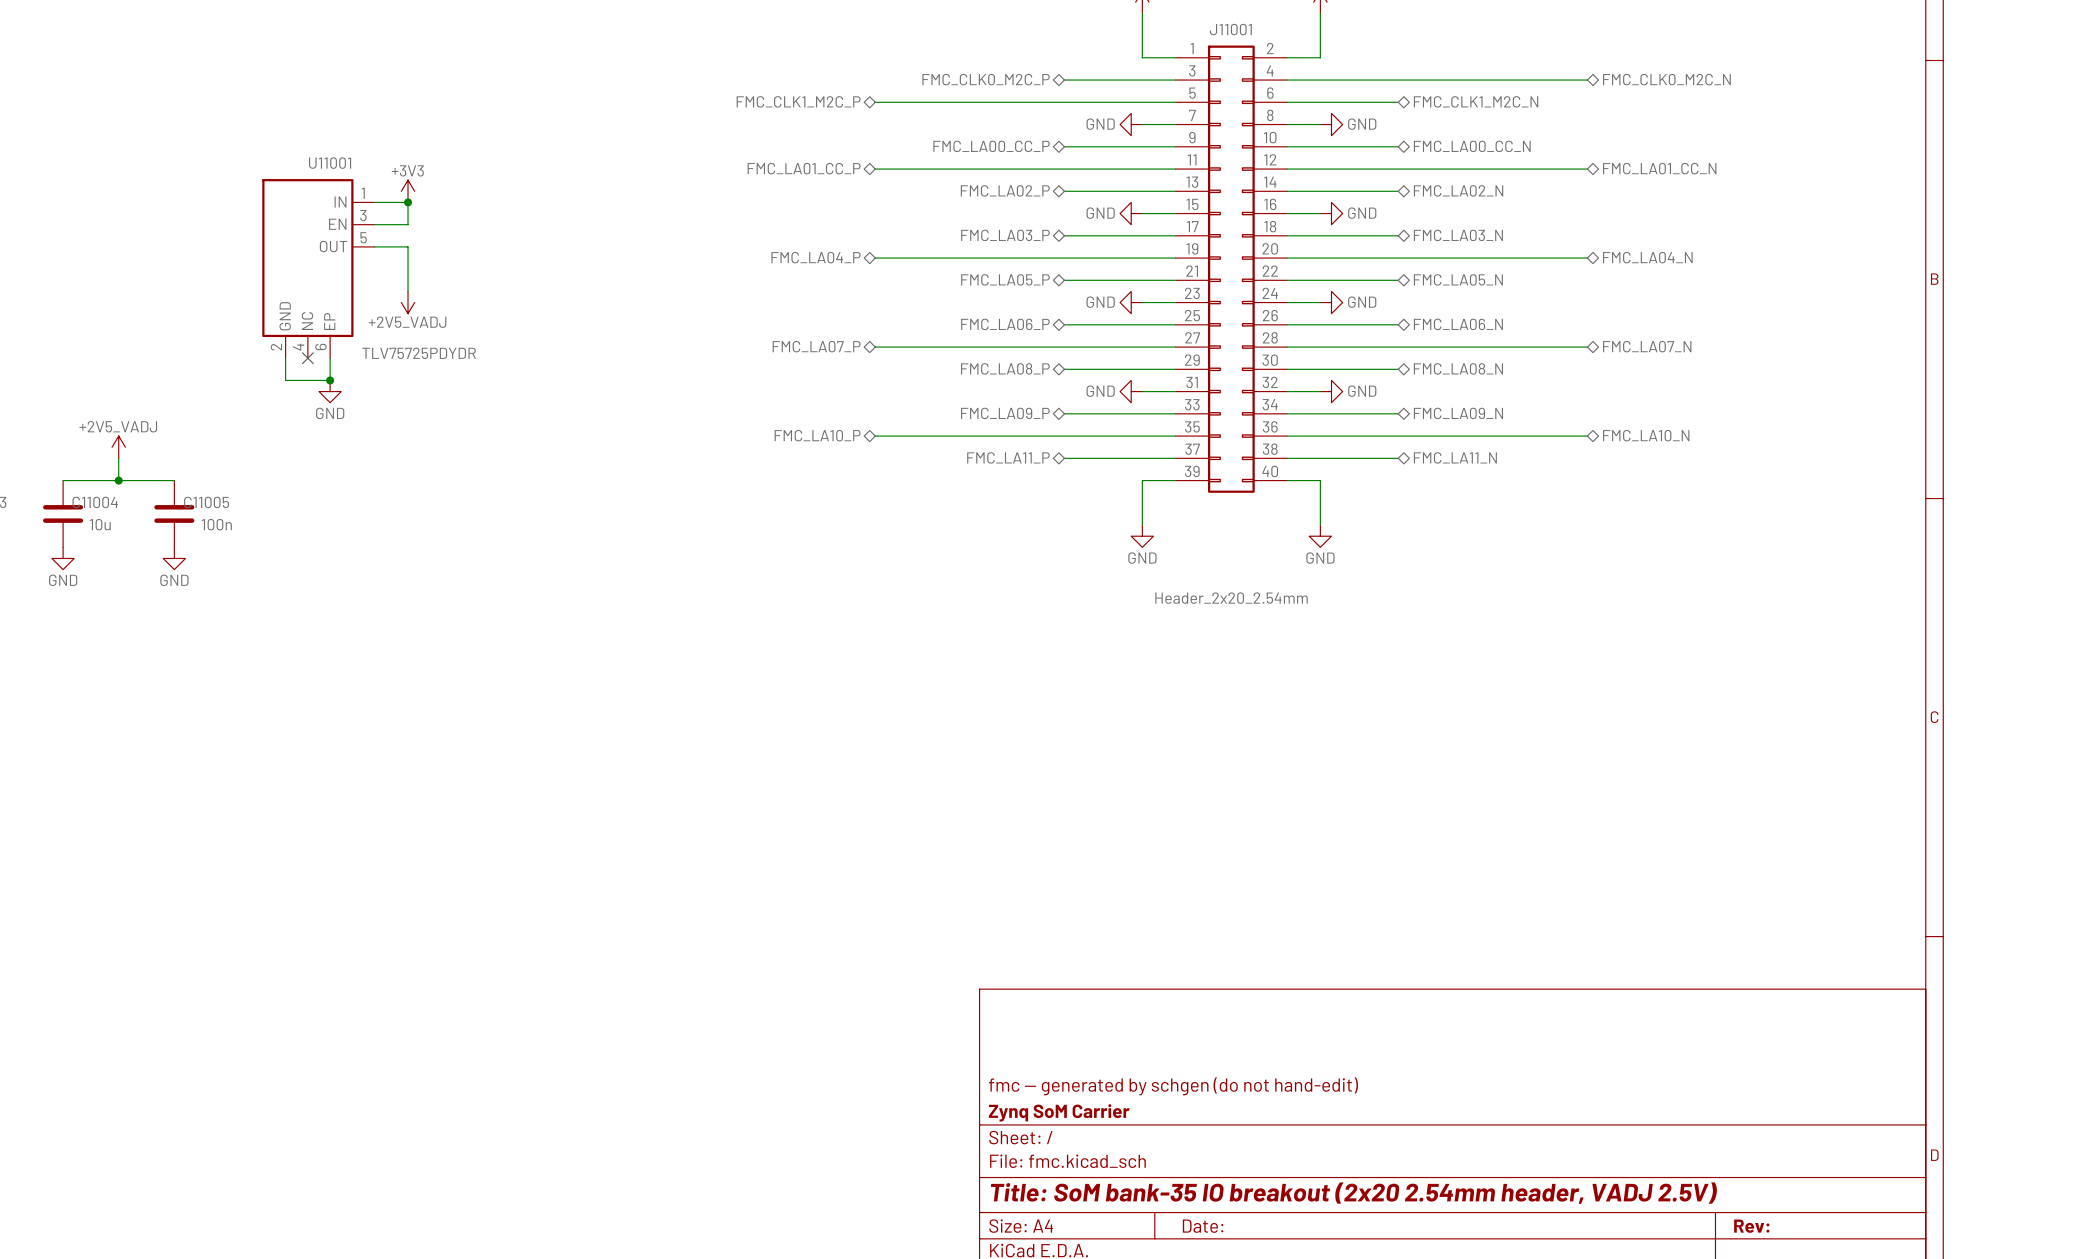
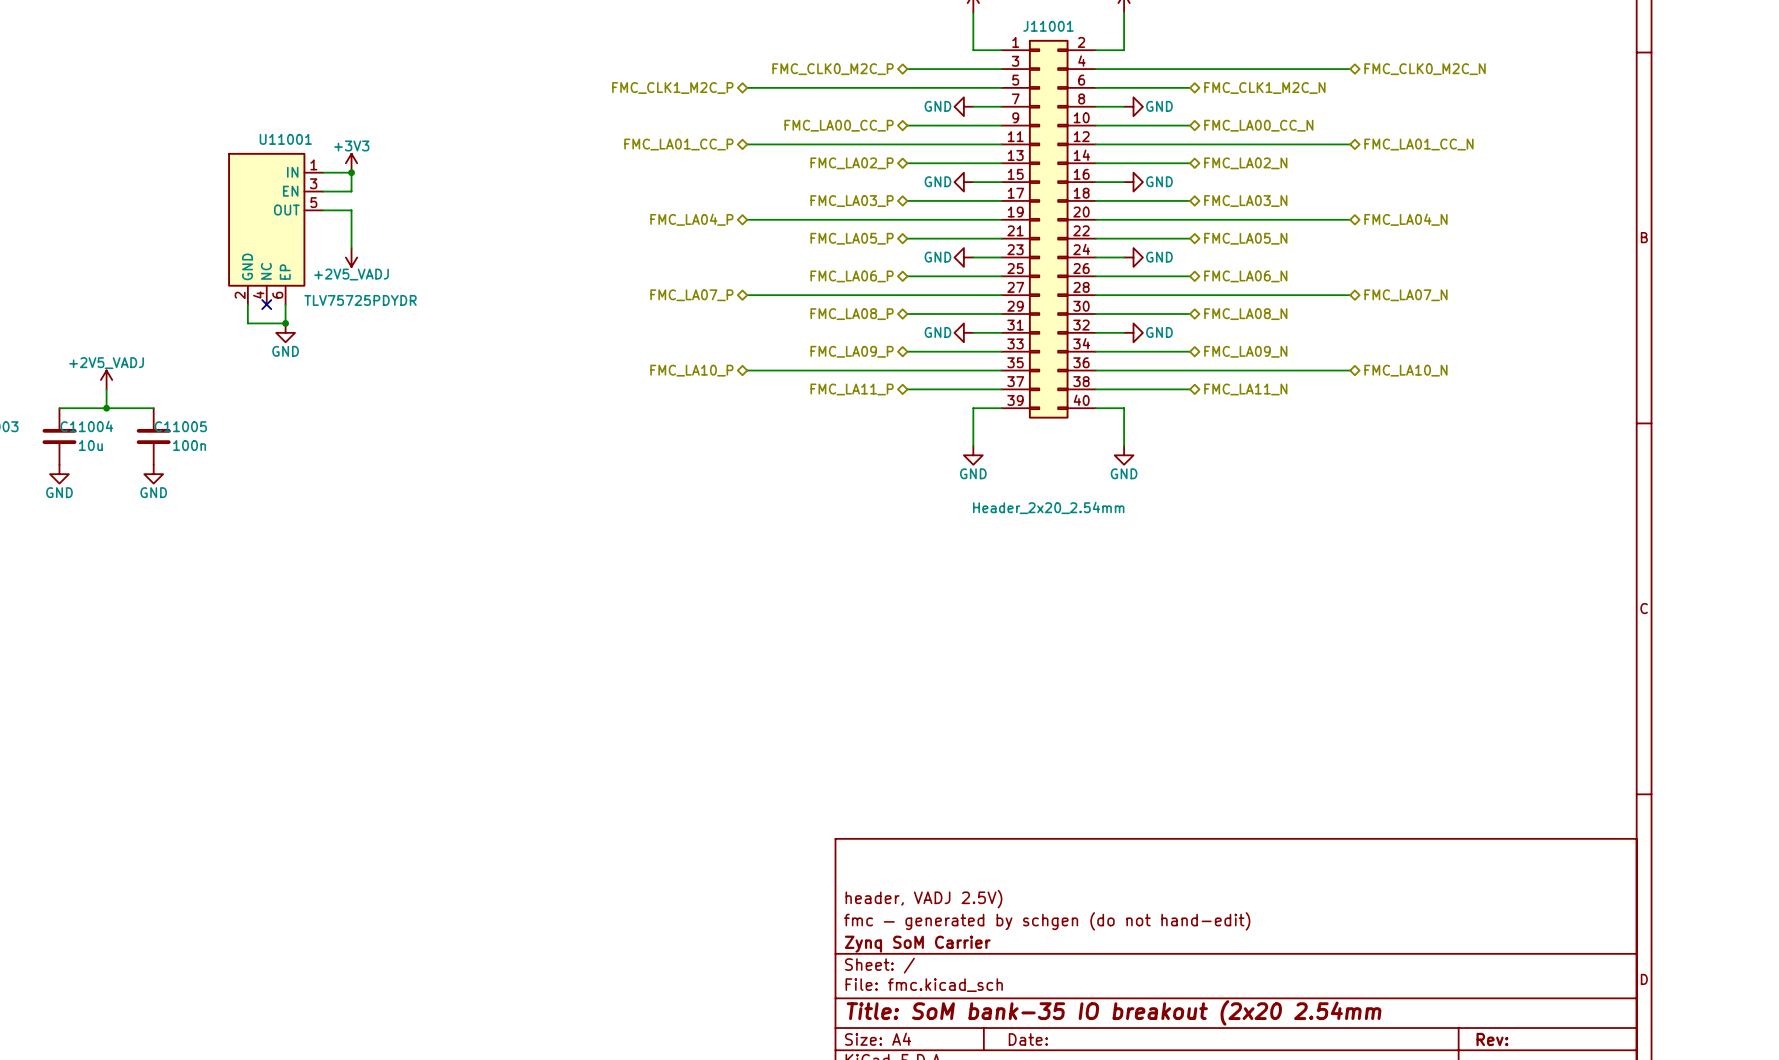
title block: none -> header, VADJ 2.5V) (923, 899)
title block: Title: SoM bank-35 IO breakout (2x20 2.54mm header, VADJ 2.5V) (1354, 1193) -> Title: SoM bank-35 IO breakout (2x20 2.54mm (1114, 1012)

